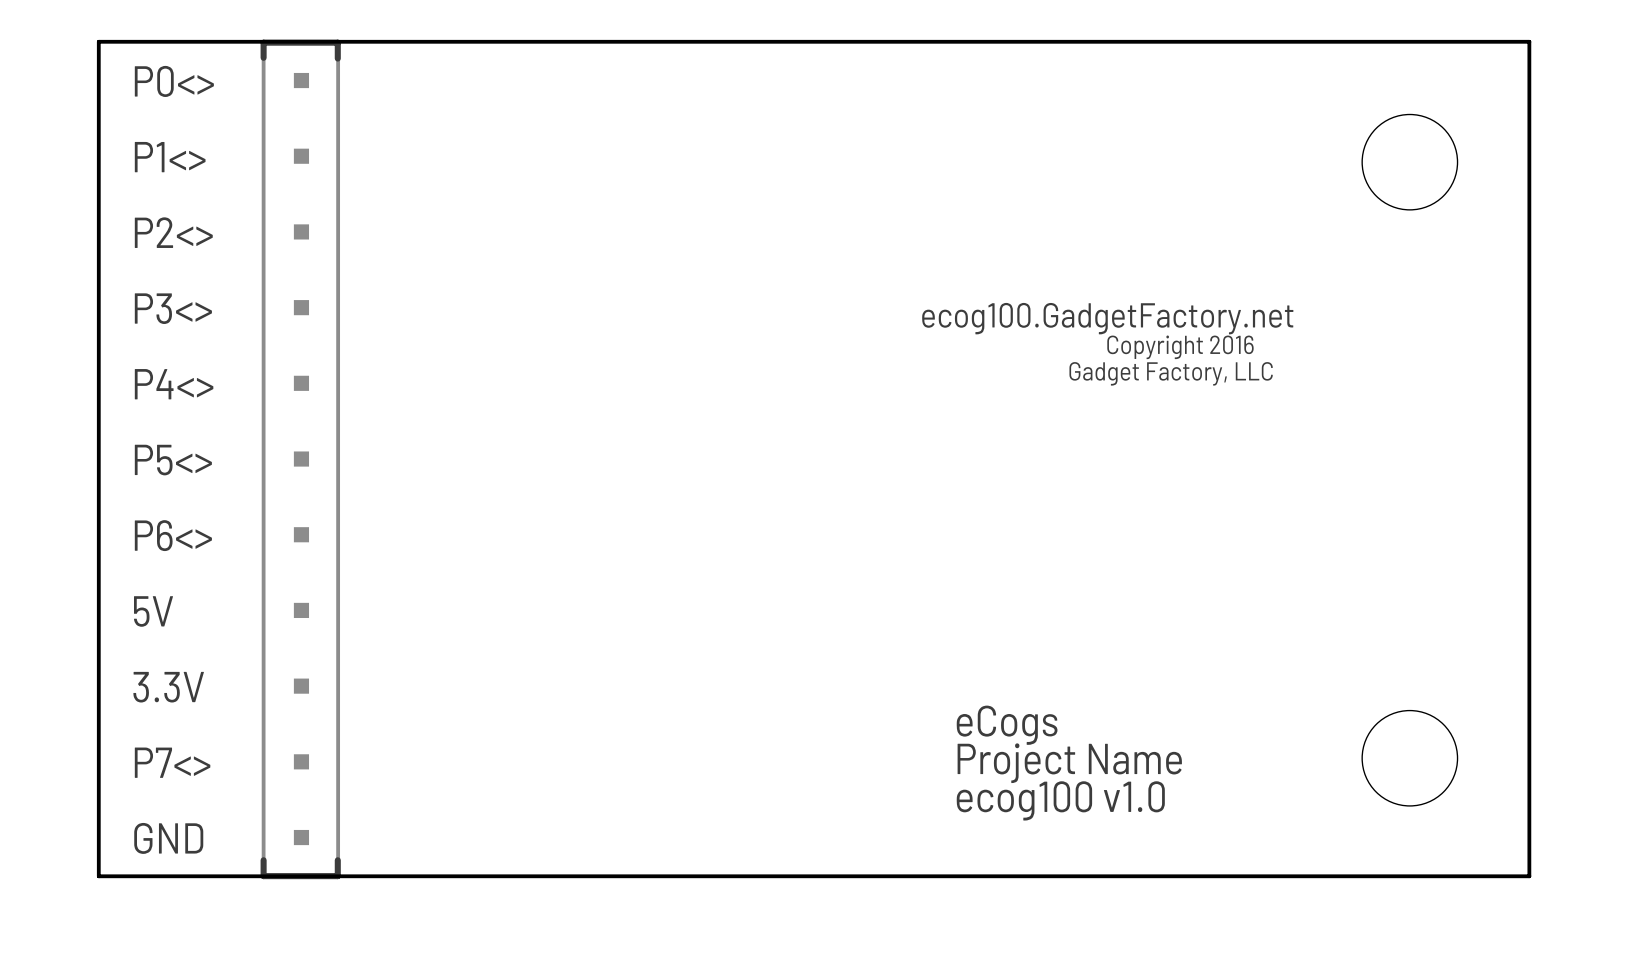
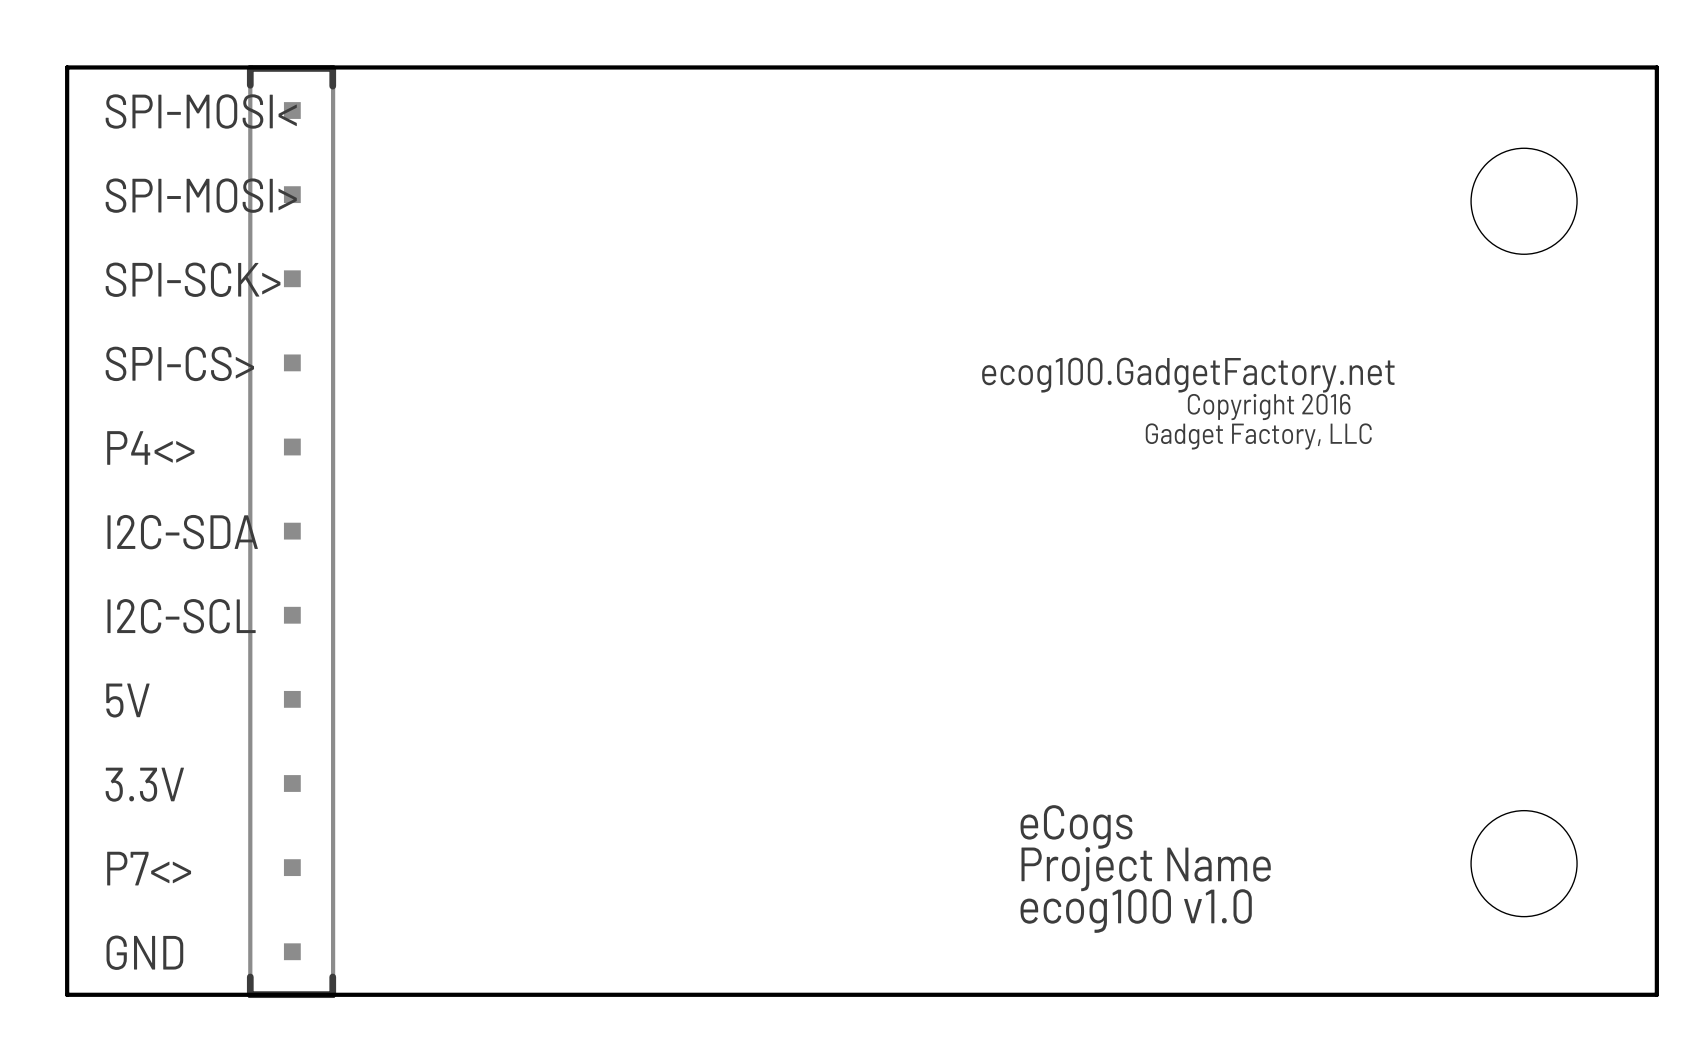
text: P0<> (174, 81) -> SPI-MOSI< (201, 111)
text: P1<> (170, 157) -> SPI-MOSI> (201, 195)
text: P2<> (173, 232) -> SPI-SCK> (193, 279)
text: P3<> (173, 308) -> SPI-CS> (179, 363)
text: P5<> (173, 460) -> I2C-SDA (182, 532)
text: P6<> (173, 535) -> I2C-SCL (181, 616)

